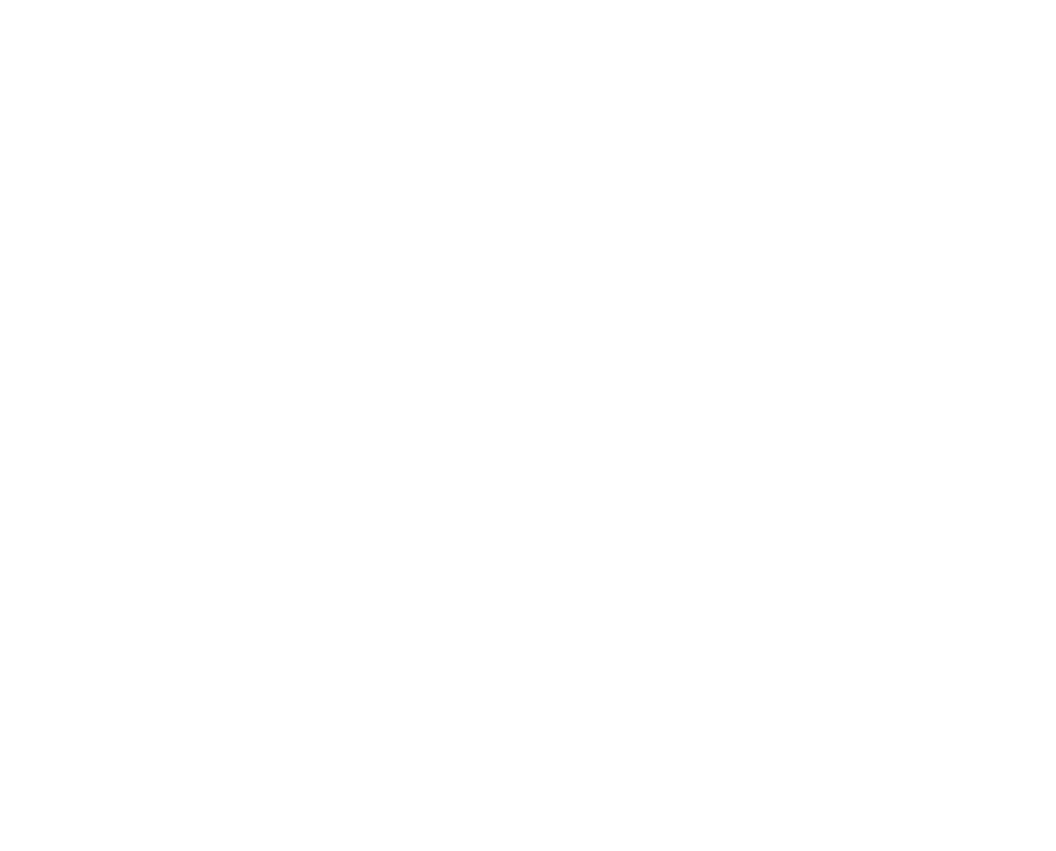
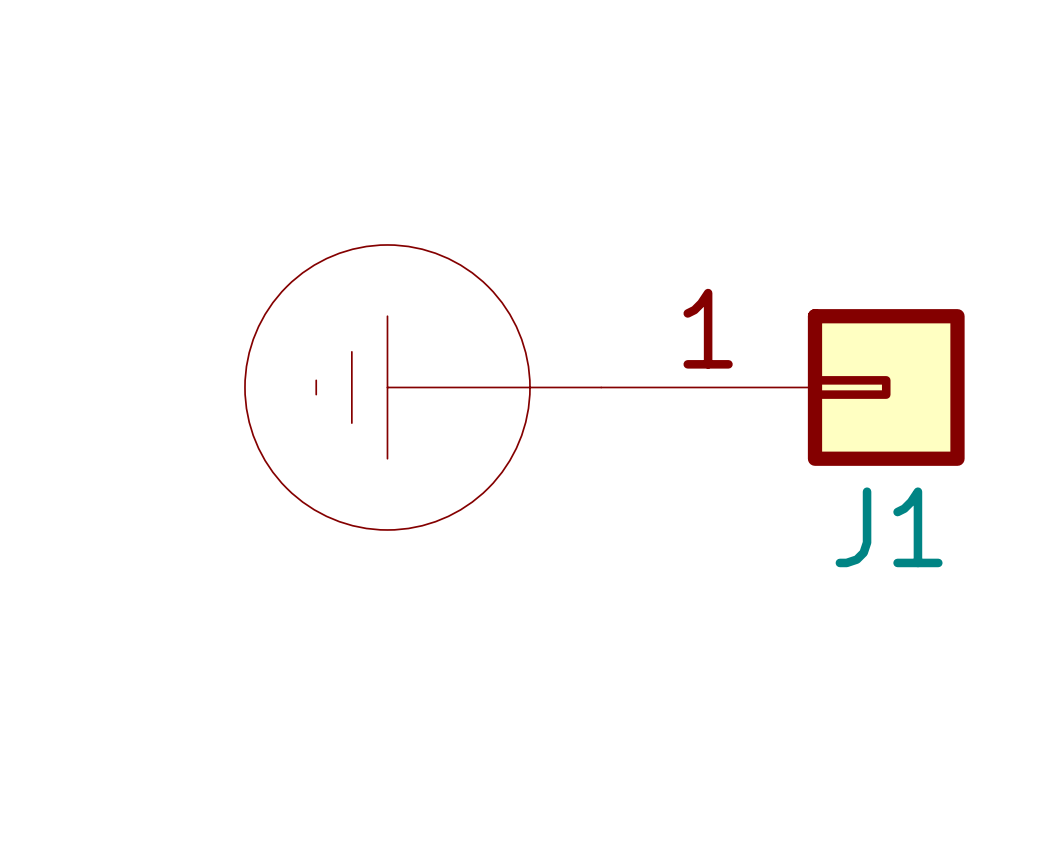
power symbol: none -> (423, 387)
J1: none -> (782, 387)

